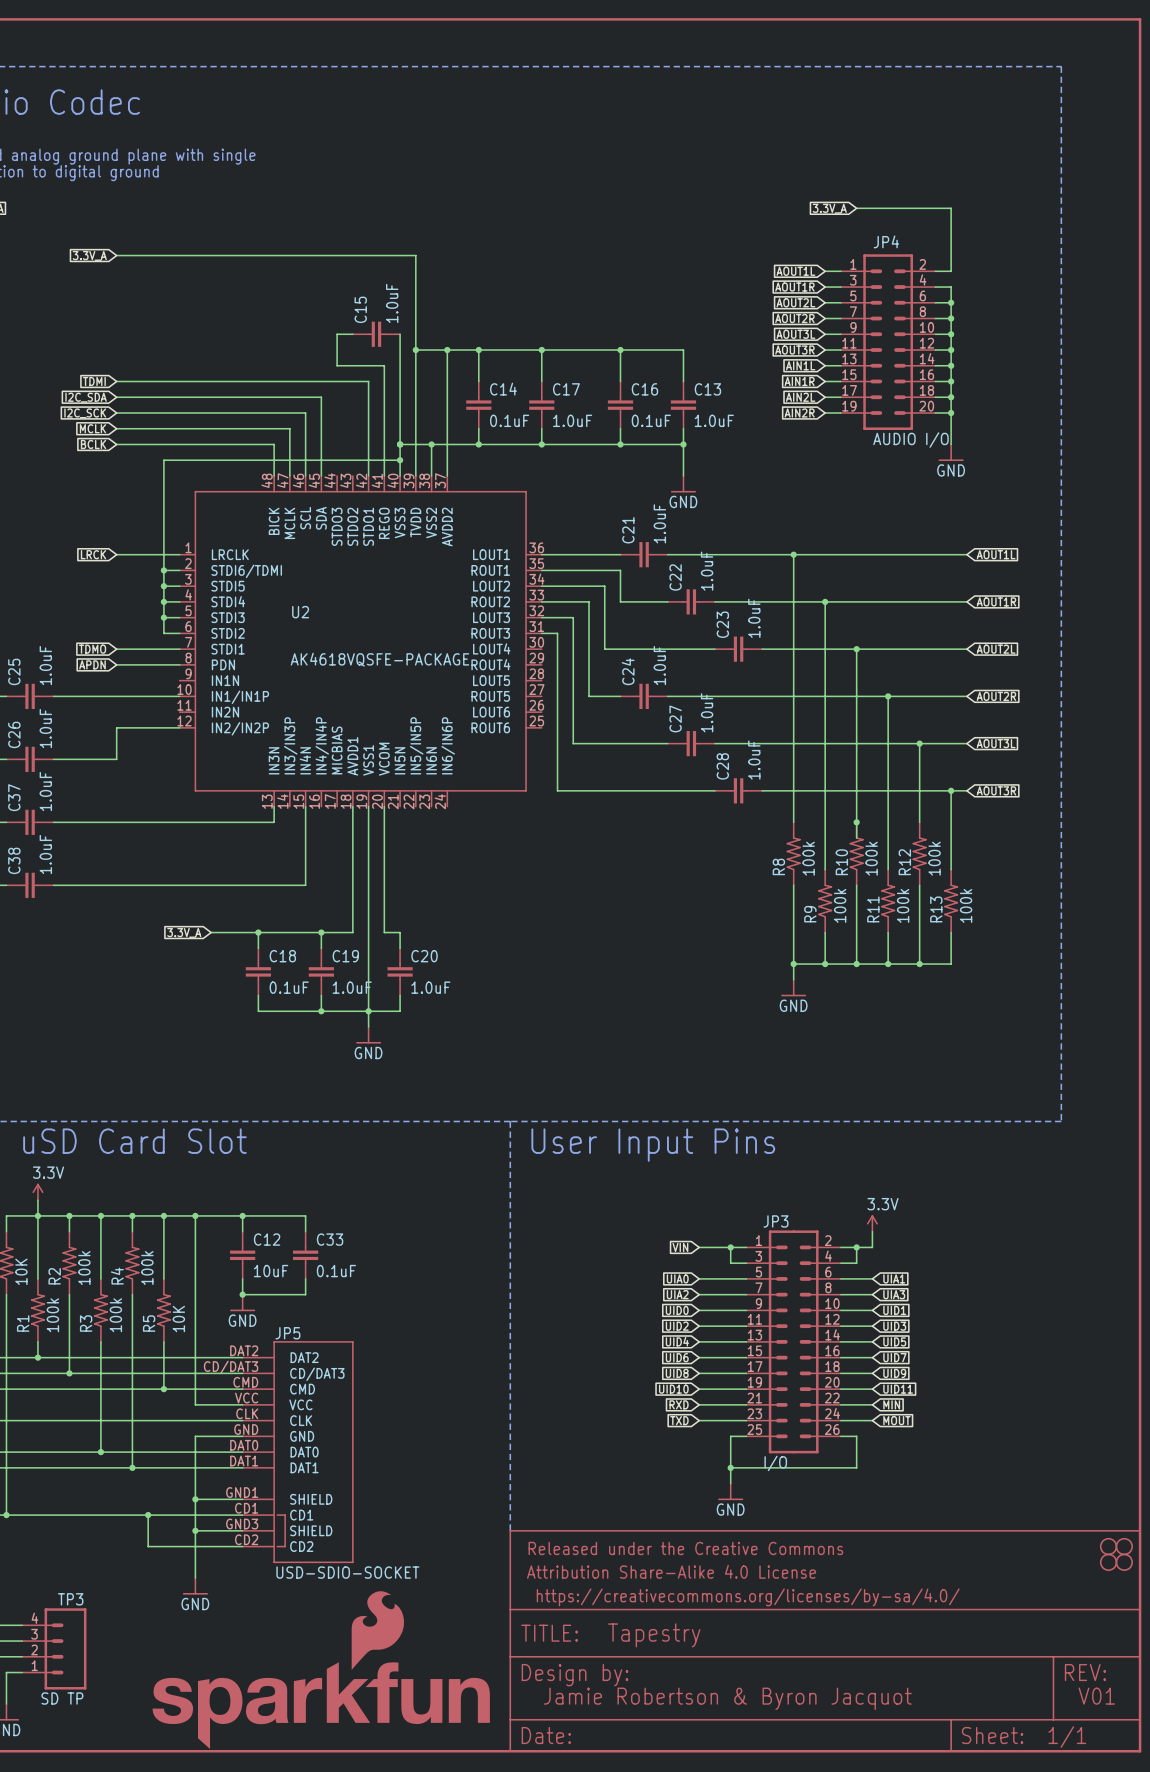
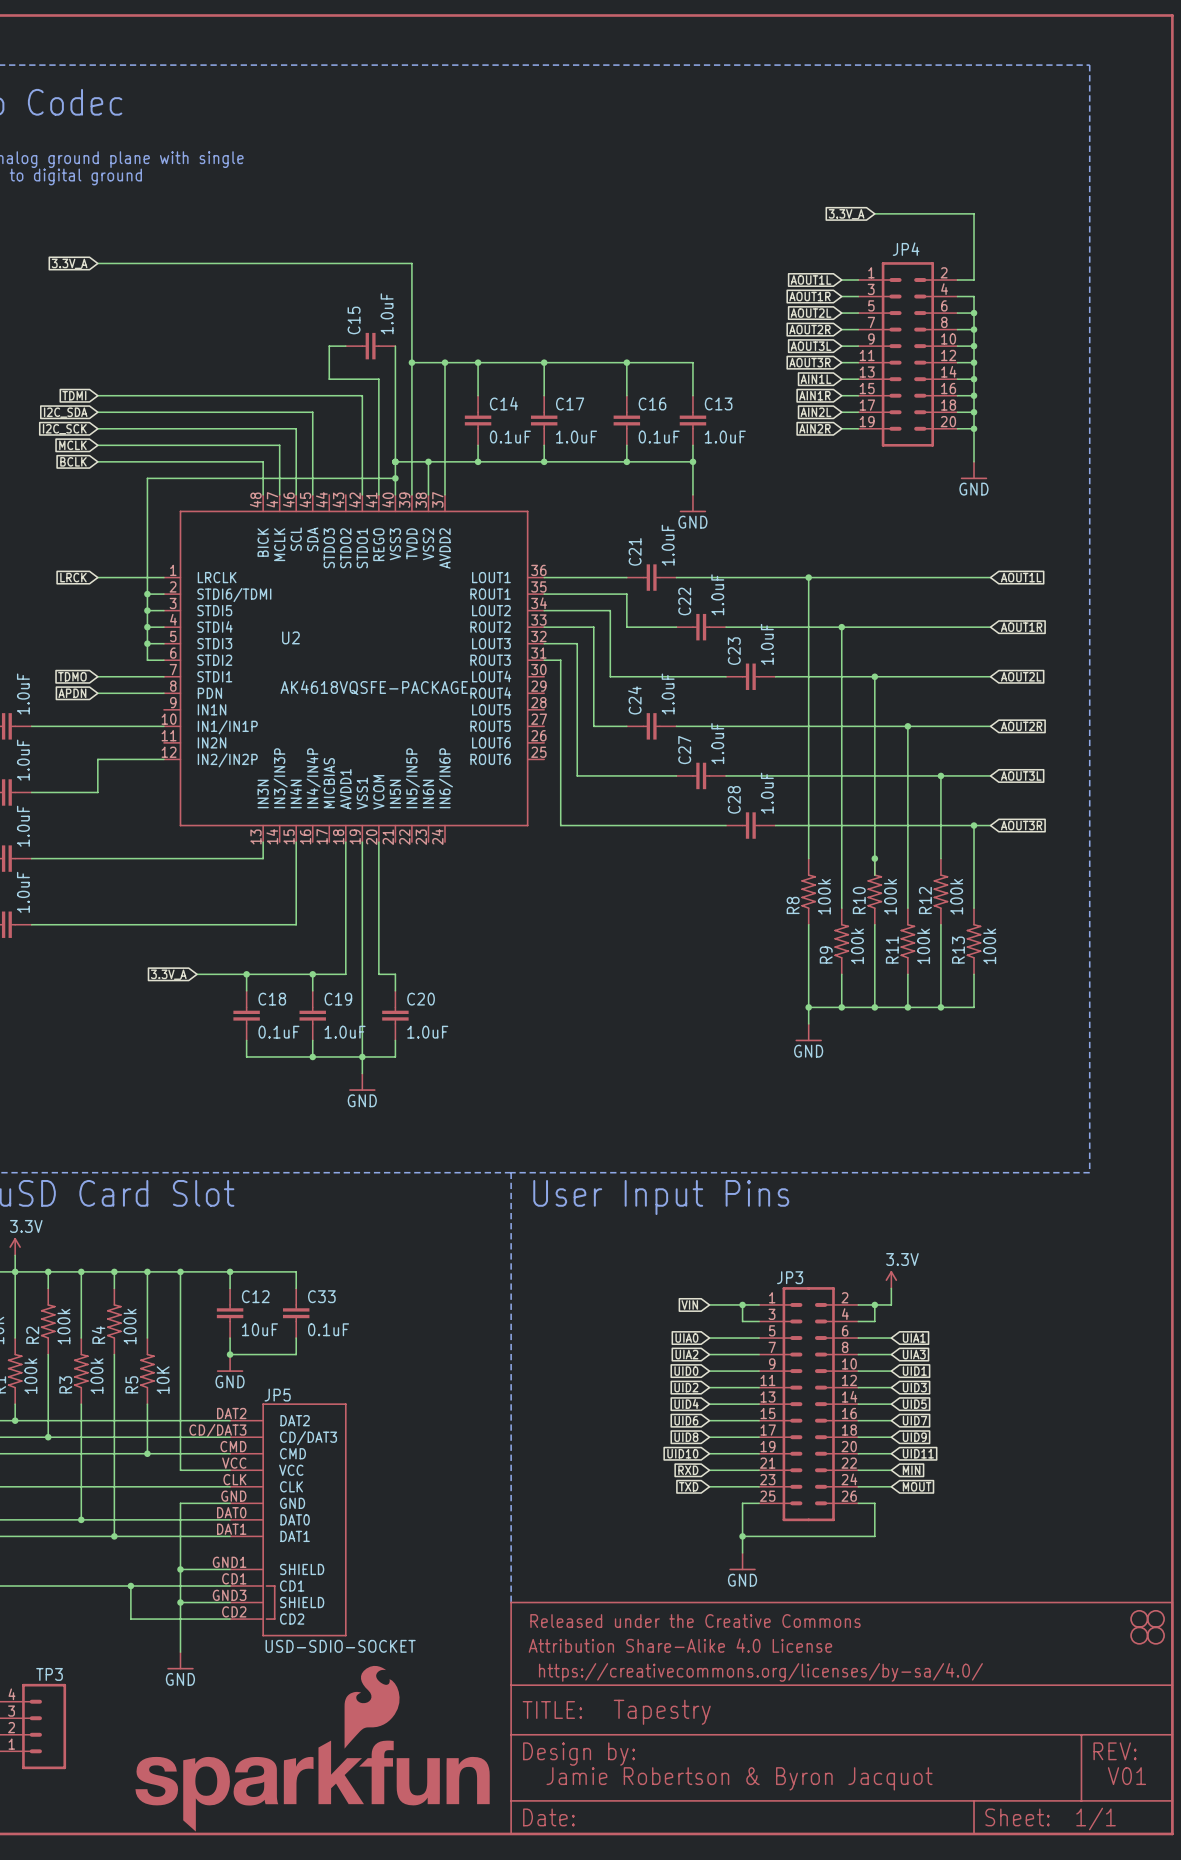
JP4 value: AUDIO I/O (911, 440) -> none
JP3 value: I/O (775, 1463) -> none
TP3 value: SD TP (62, 1698) -> none

